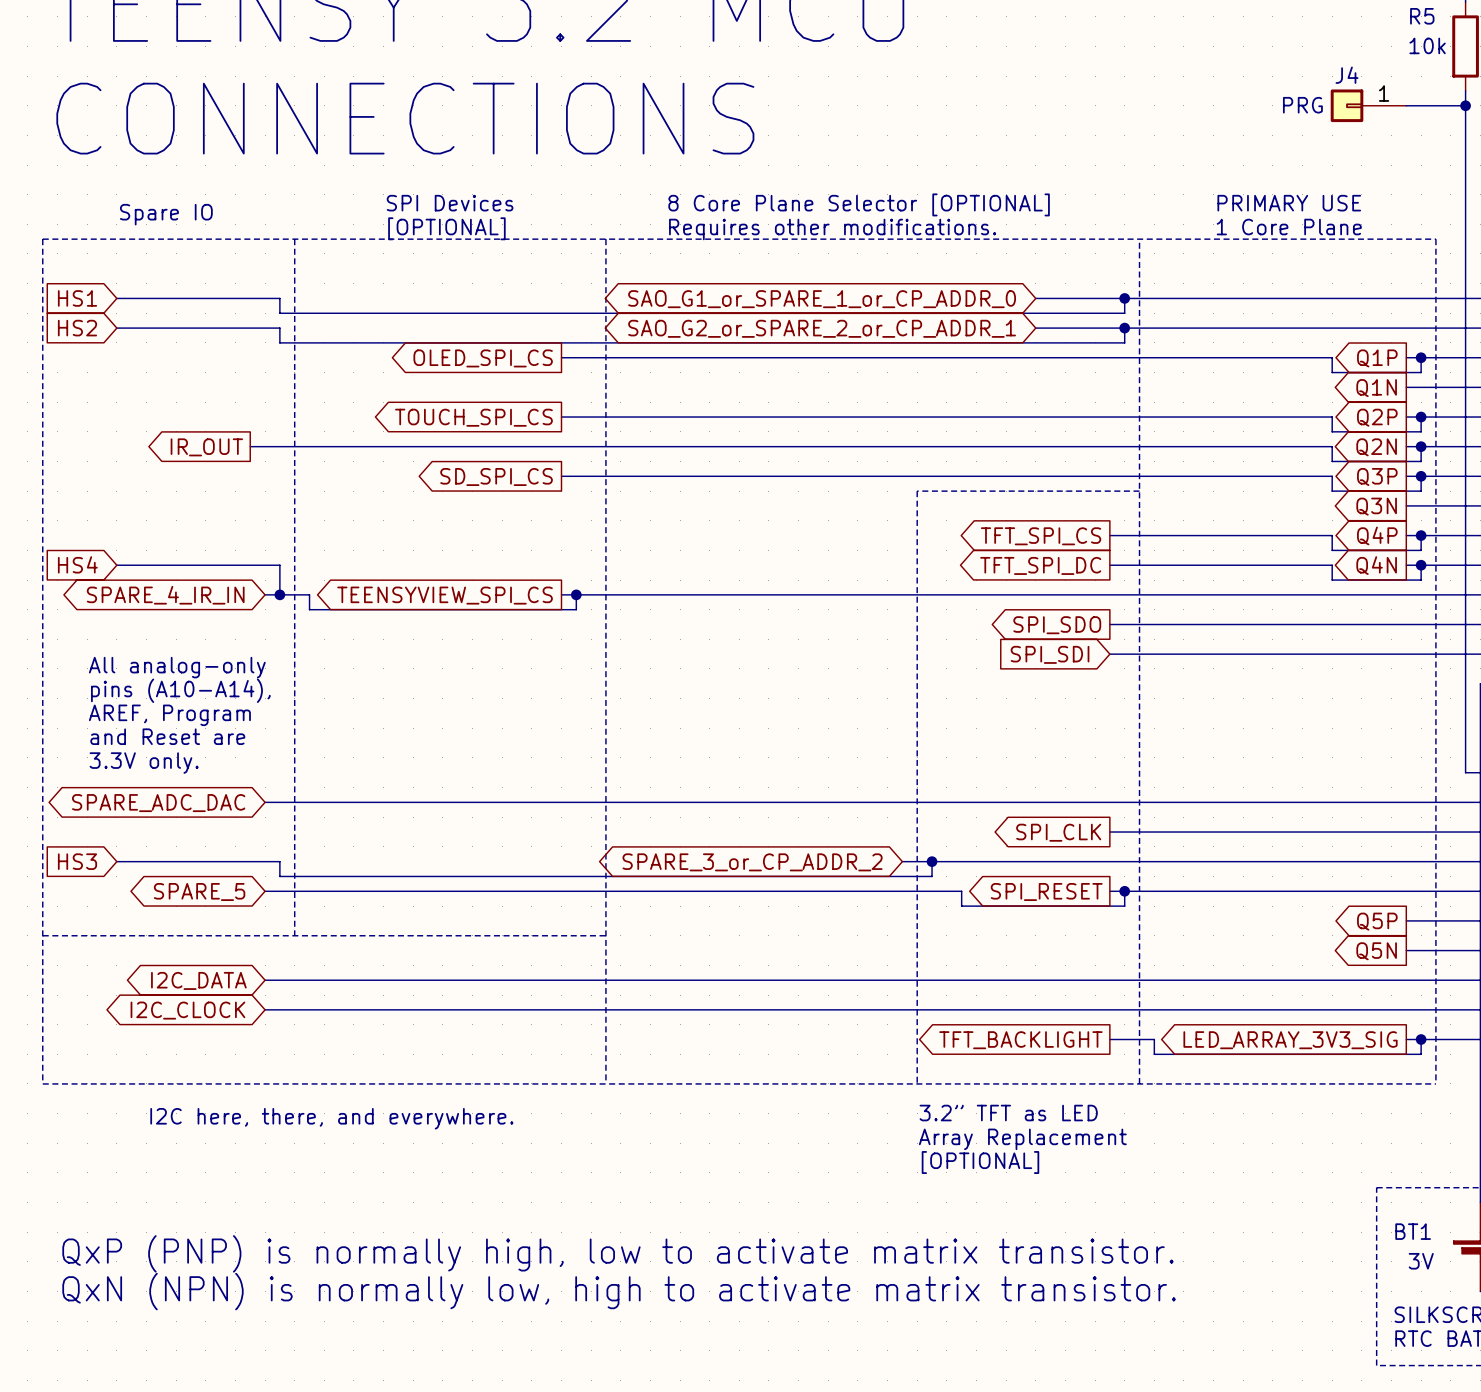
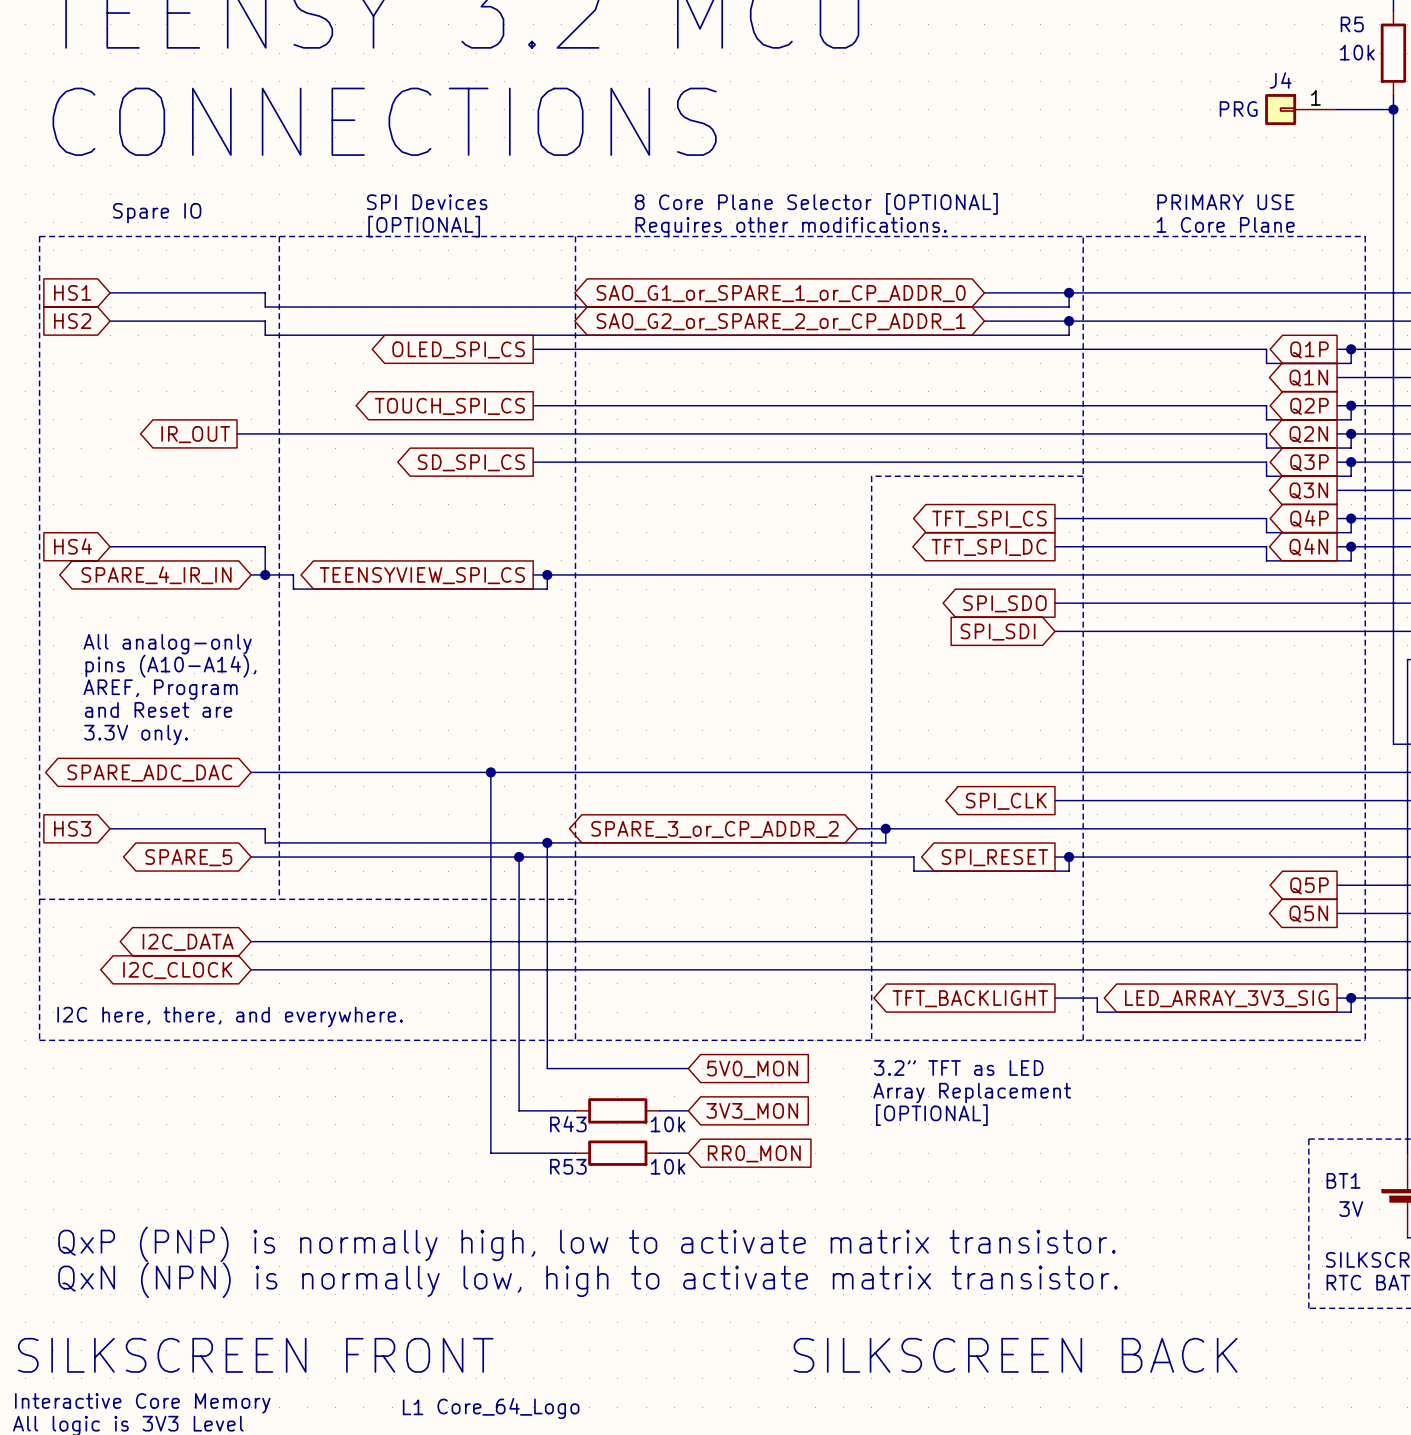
wire: none -> (490, 772) (490, 1153) (575, 1153)
junction: none -> (490, 772)
wire: none -> (547, 842) (547, 1068) (688, 1068)
junction: none -> (547, 842)
wire: none -> (519, 857) (519, 1110) (575, 1110)
junction: none -> (519, 857)
global label: none -> 5V0_MON (752, 1069)
text position: I2C here, there, and everywhere. (331, 1118) -> I2C here, there, and everywhere. (230, 1017)
R43: none -> 10k (617, 1110)
wire: none -> (660, 1110) (688, 1110)
global label: none -> 3V3_MON (752, 1111)
R53: none -> 10k (617, 1153)
wire: none -> (660, 1153) (688, 1153)
global label: none -> RR0_MON (754, 1153)
text position: QxP (PNP) is normally high, low to activate matrix transistor. (617, 1253) -> QxP (PNP) is normally high, low to activate matrix transistor. (586, 1244)
text position: QxN (NPN) is normally low, high to activate matrix transistor. (619, 1291) -> QxN (NPN) is normally low, high to activate matrix transistor. (587, 1280)

